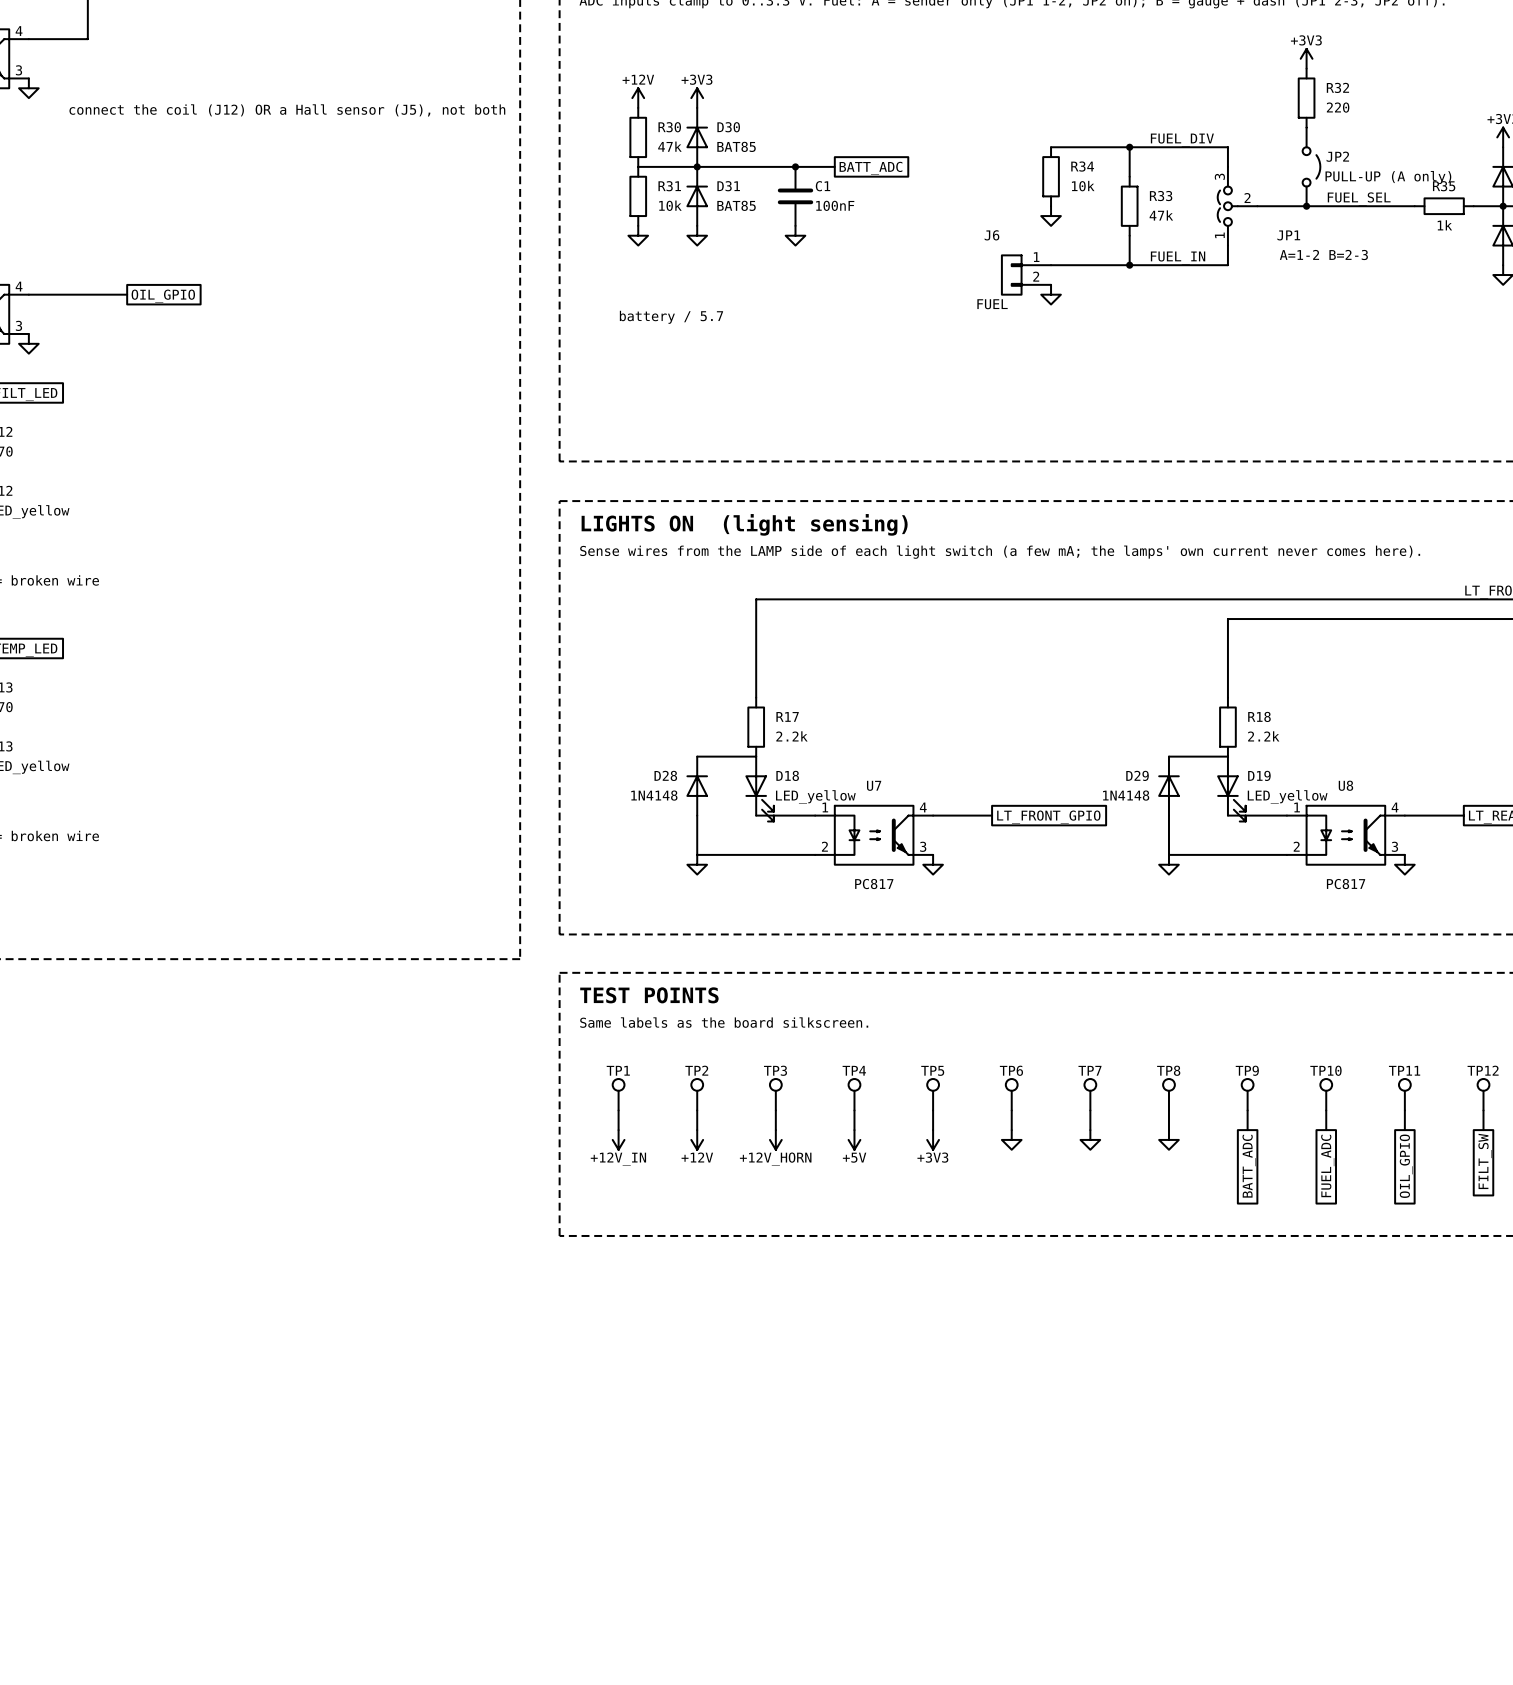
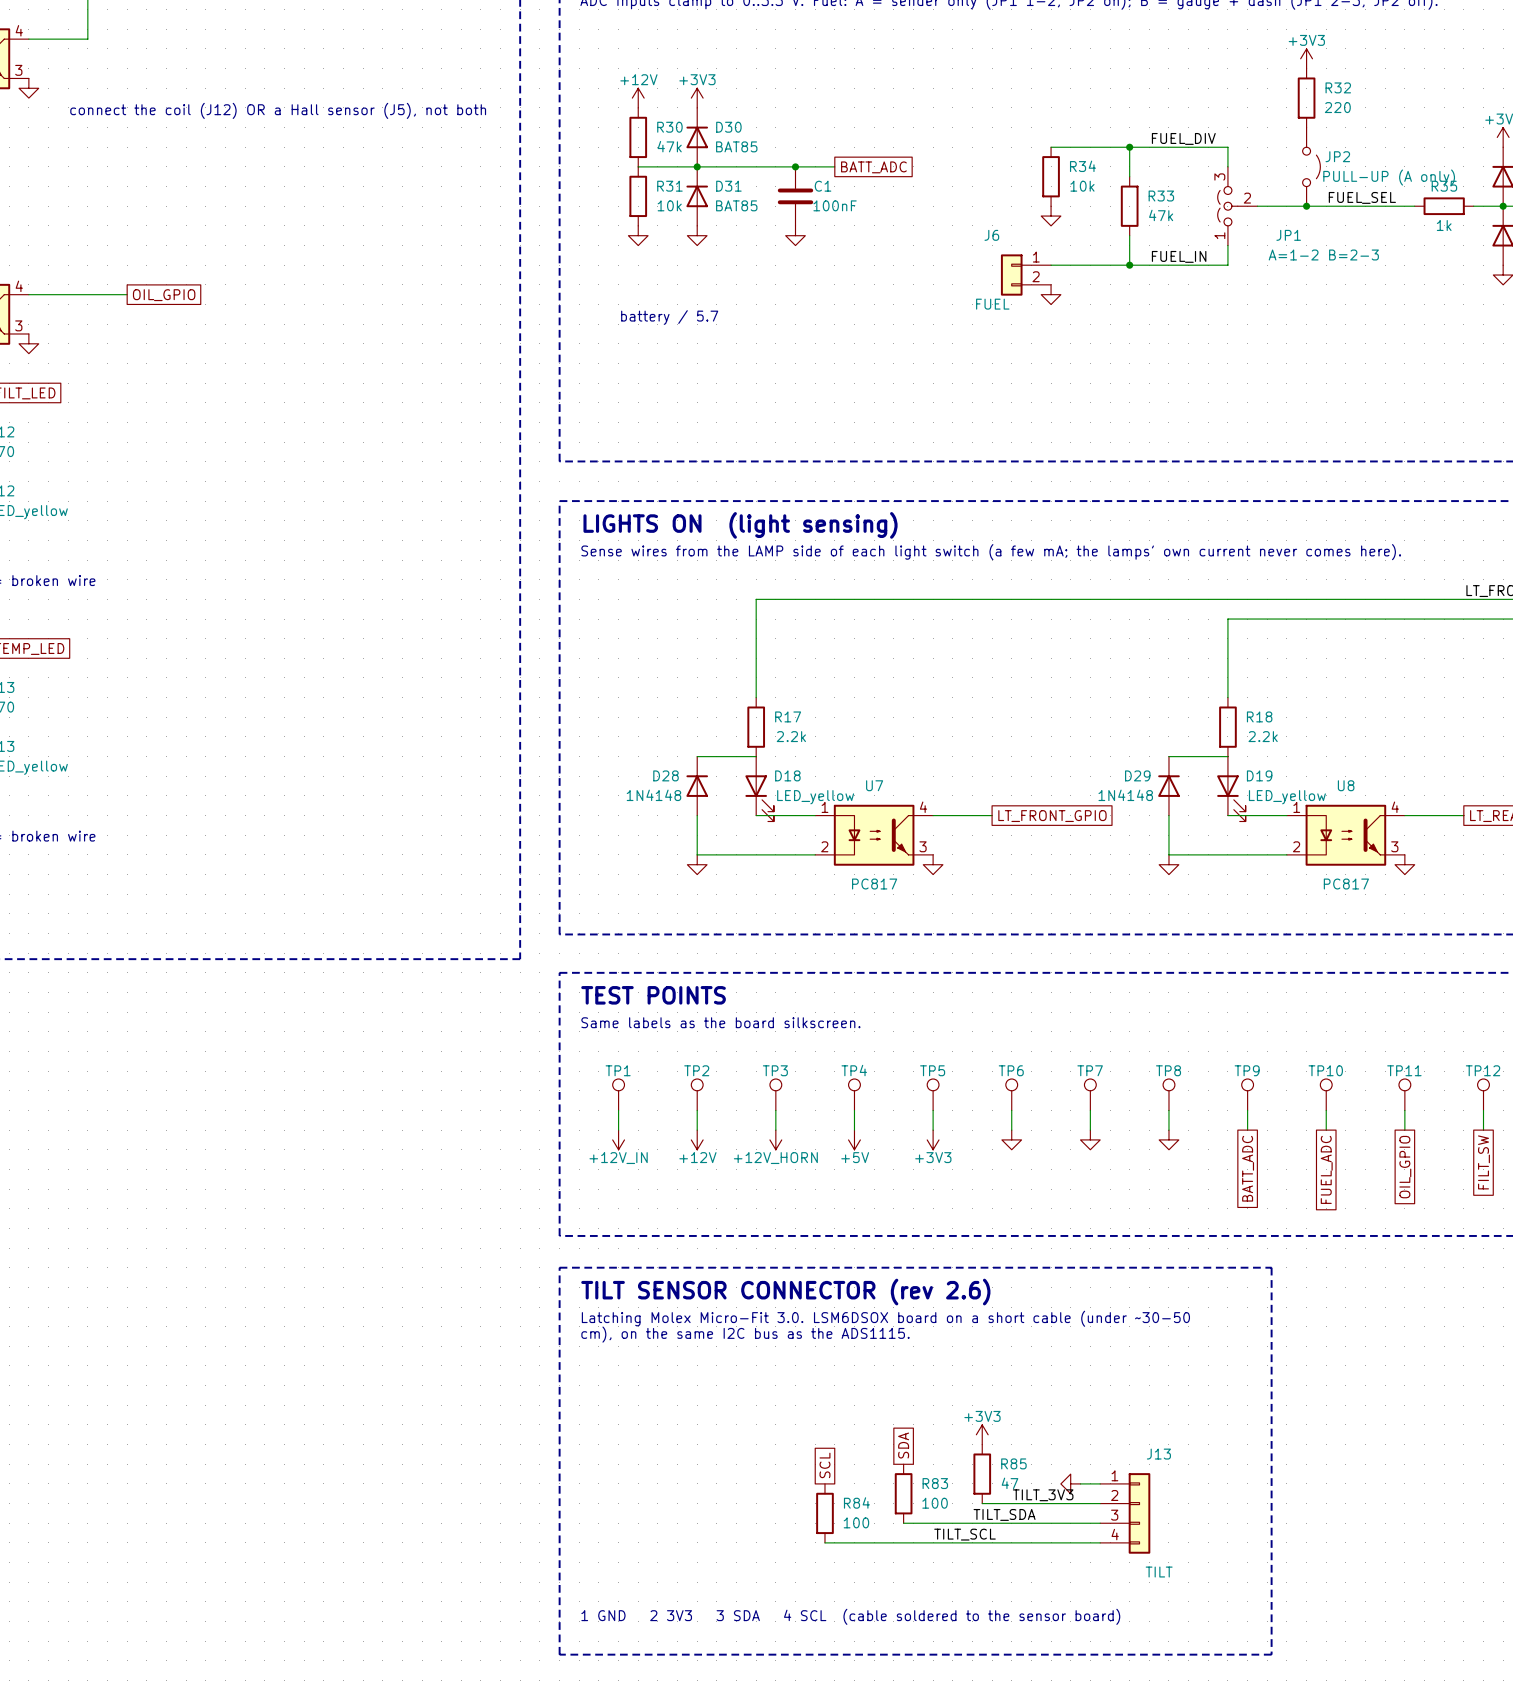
line: none -> (559, 1267) (1271, 1267) (1271, 1654) (559, 1654) (559, 1267)
text: none -> TILT SENSOR CONNECTOR (rev 2.6) (785, 1292)
text: none -> Latching Molex Micro-Fit 3.0. LSM6DSOX board on a short cable (under ~30-50 (885, 1318)
text: none -> cm), on the same I2C bus as the ADS1115. (745, 1334)
power symbol: none -> +3V3 (982, 1434)
global label: none -> SDA (903, 1445)
global label: none -> SCL (824, 1465)
R85: none -> 47 (982, 1474)
power symbol: none -> (1070, 1483)
wire: none -> (1080, 1483) (1100, 1483)
R83: none -> 100 (903, 1493)
label: none -> TILT_3V3 (1043, 1495)
wire: none -> (982, 1503) (1100, 1503)
R84: none -> 100 (824, 1513)
J13: none -> TILT (1125, 1513)
label: none -> TILT_SDA (1004, 1514)
wire: none -> (903, 1523) (1100, 1523)
label: none -> TILT_SCL (965, 1534)
wire: none -> (824, 1542) (1100, 1542)
text: none -> 1 GND 2 3V3 3 SDA 4 SCL (cable soldered to the sensor board) (850, 1616)

